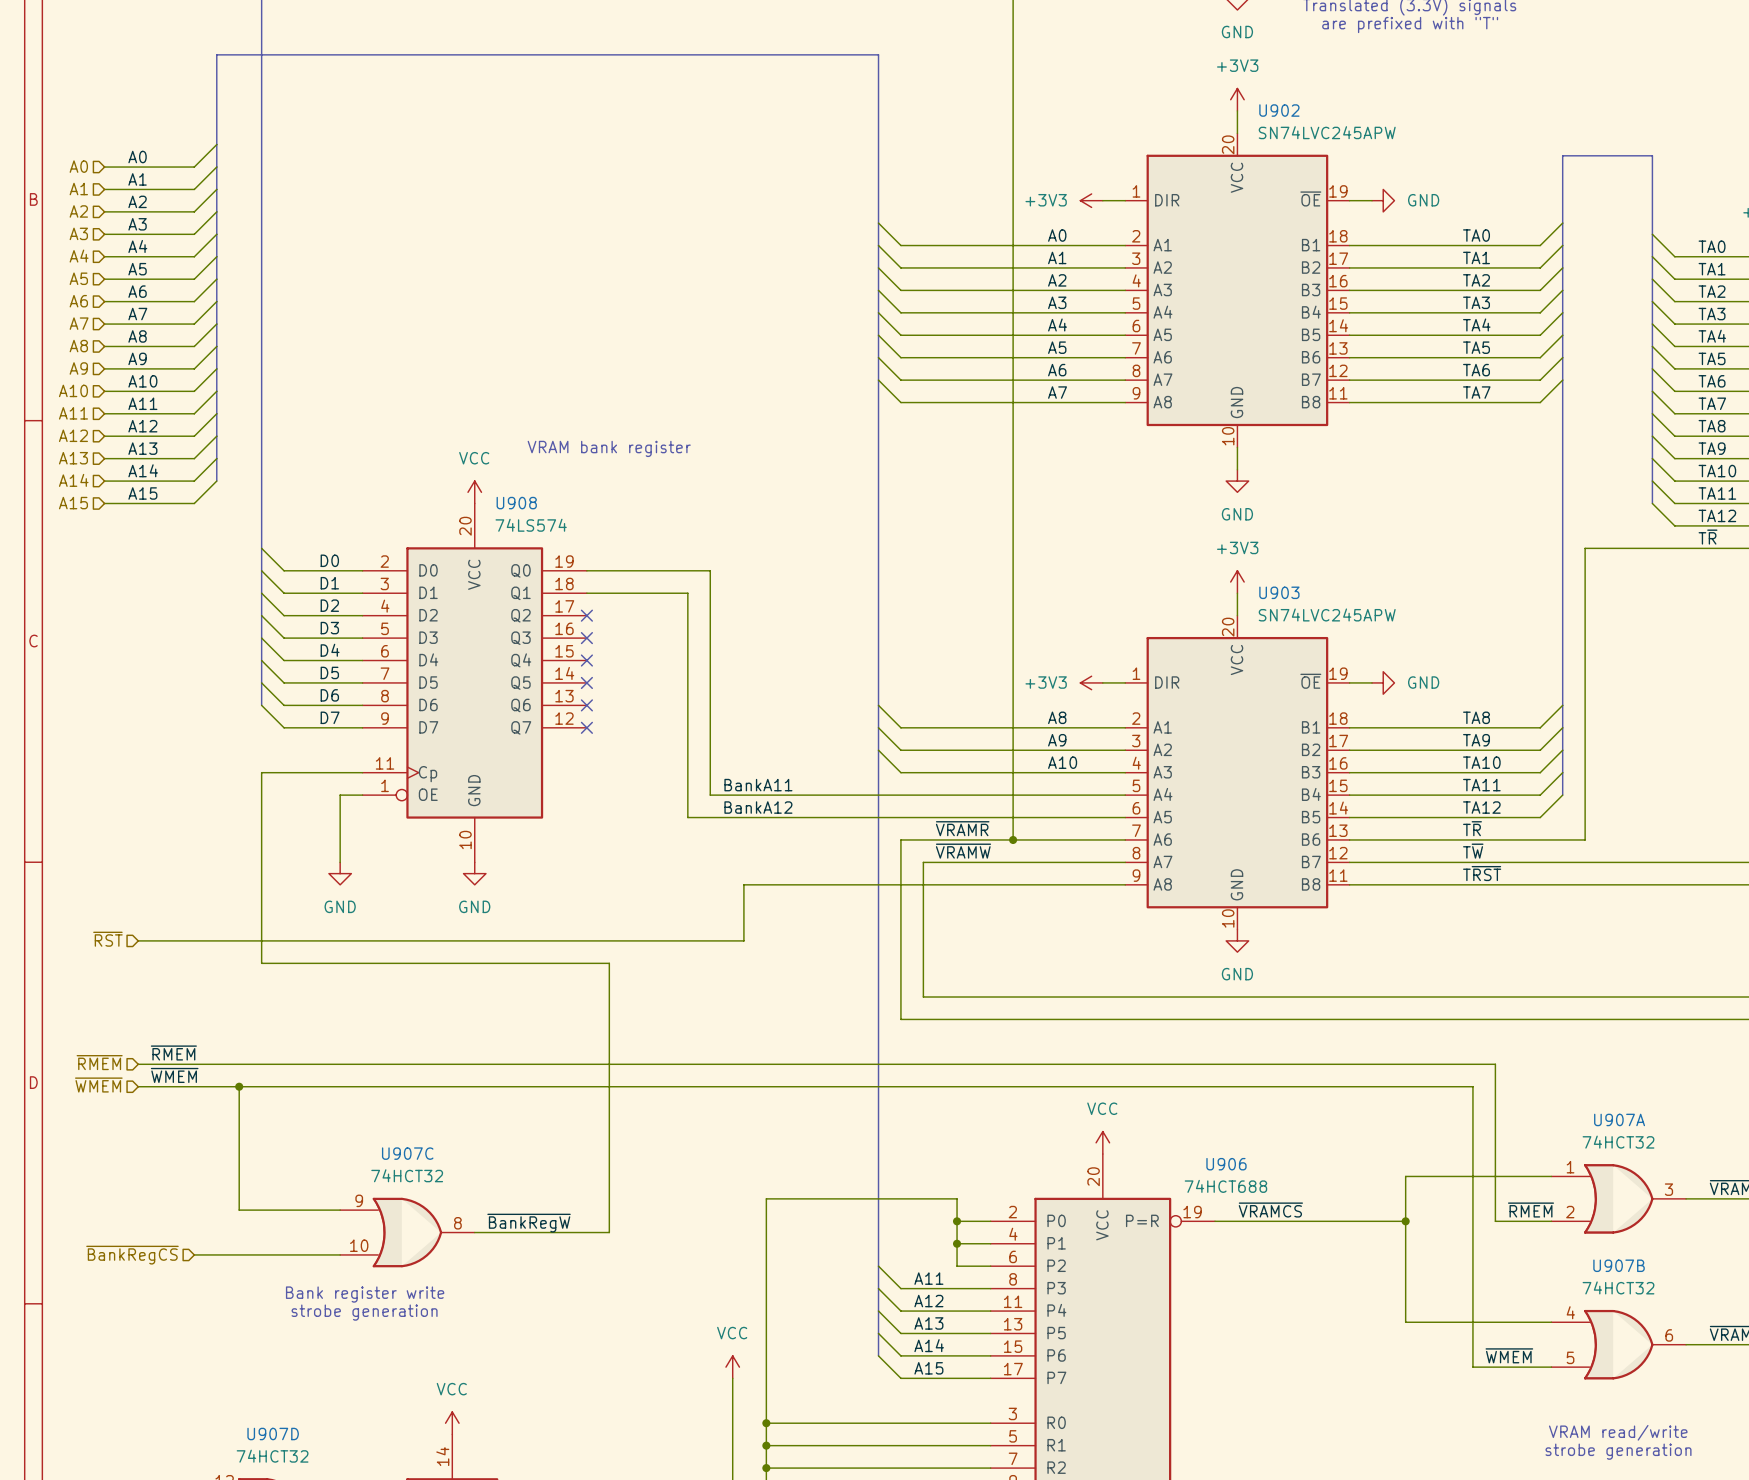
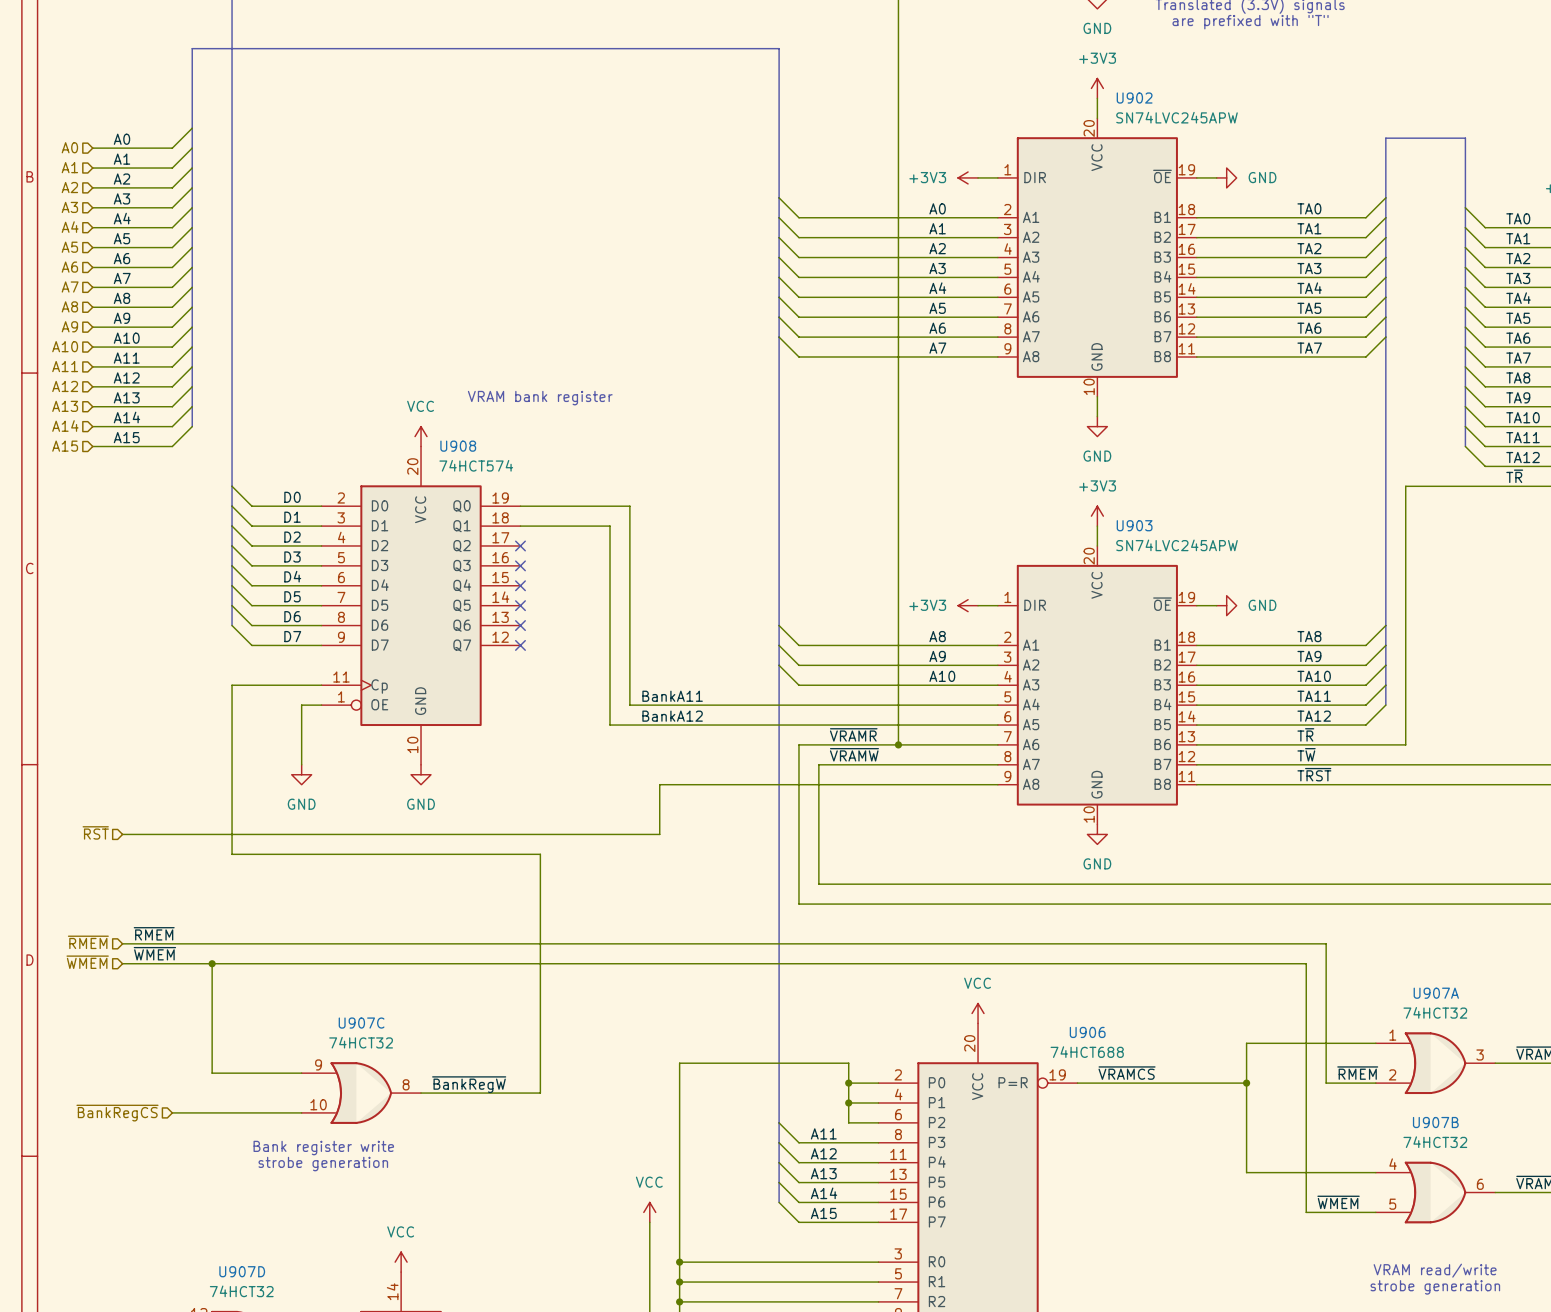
U908 value: 74LS574 (531, 525) -> 74HCT574 (476, 465)

